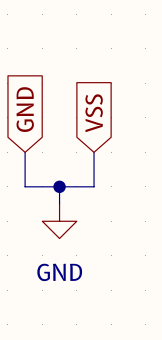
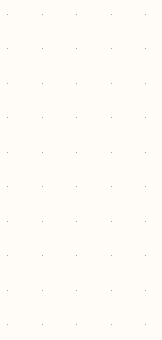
global label: GND (25, 109) -> none
global label: VSS (94, 113) -> none
wire: (25, 152) (25, 186) (94, 186) (94, 152) -> none
wire: (59, 186) (59, 204) -> none
junction: (59, 186) -> none
power symbol: GND (59, 221) -> none

